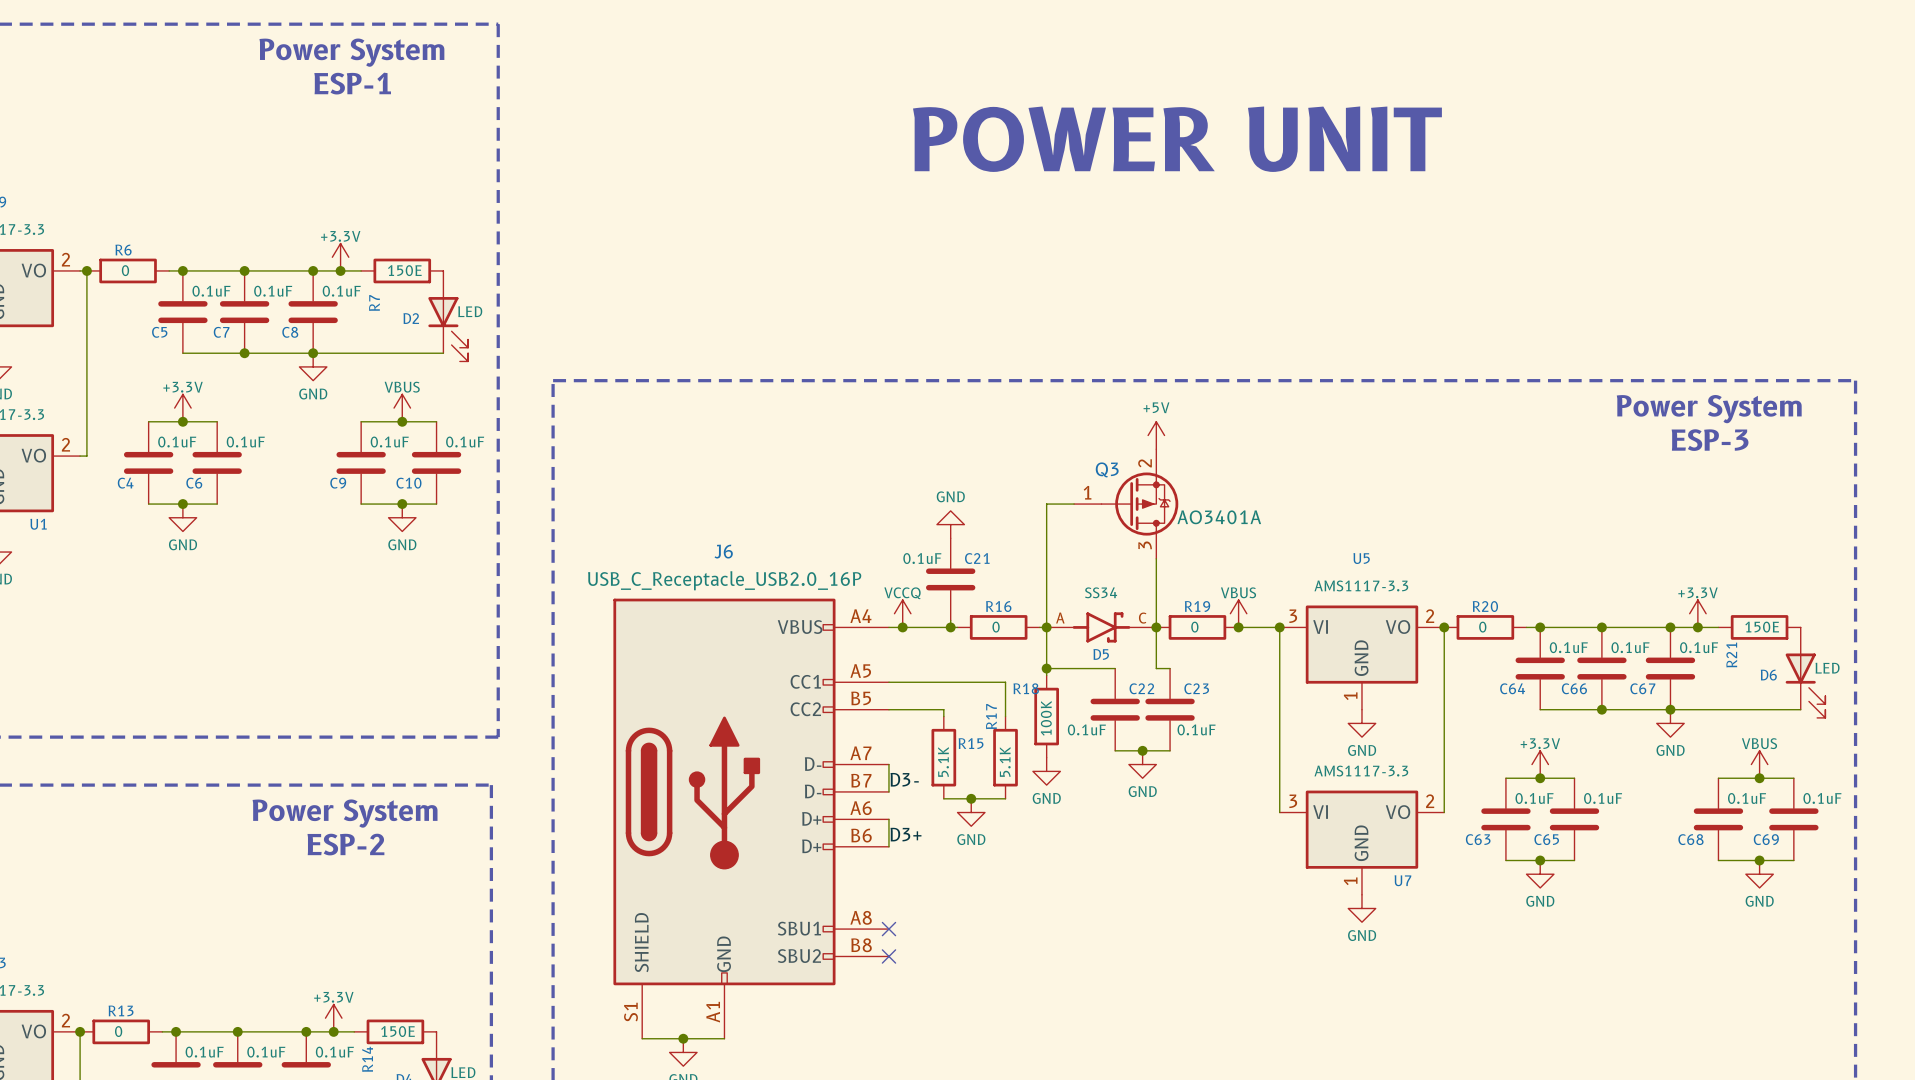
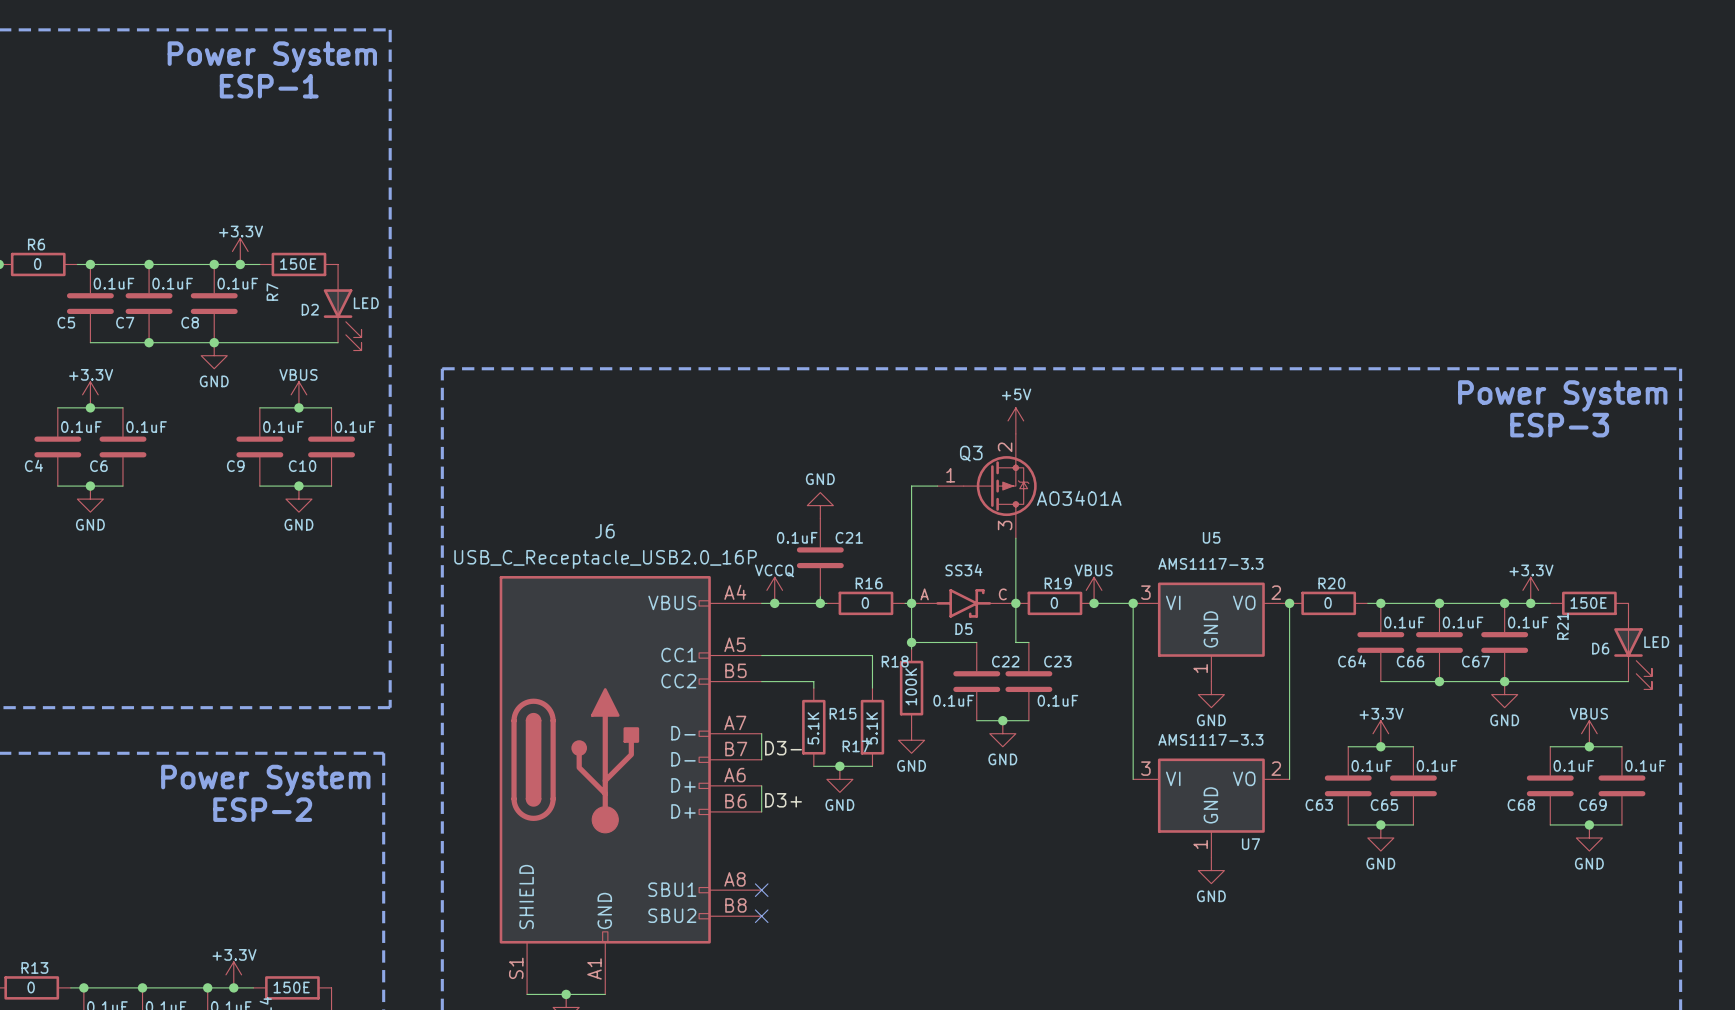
text: POWER UNIT (1177, 139) -> none
R17 name rotation: 0° (991, 716) -> 90° clockwise (856, 746)
R17 name position: R17 (991, 716) -> R17 (856, 746)

